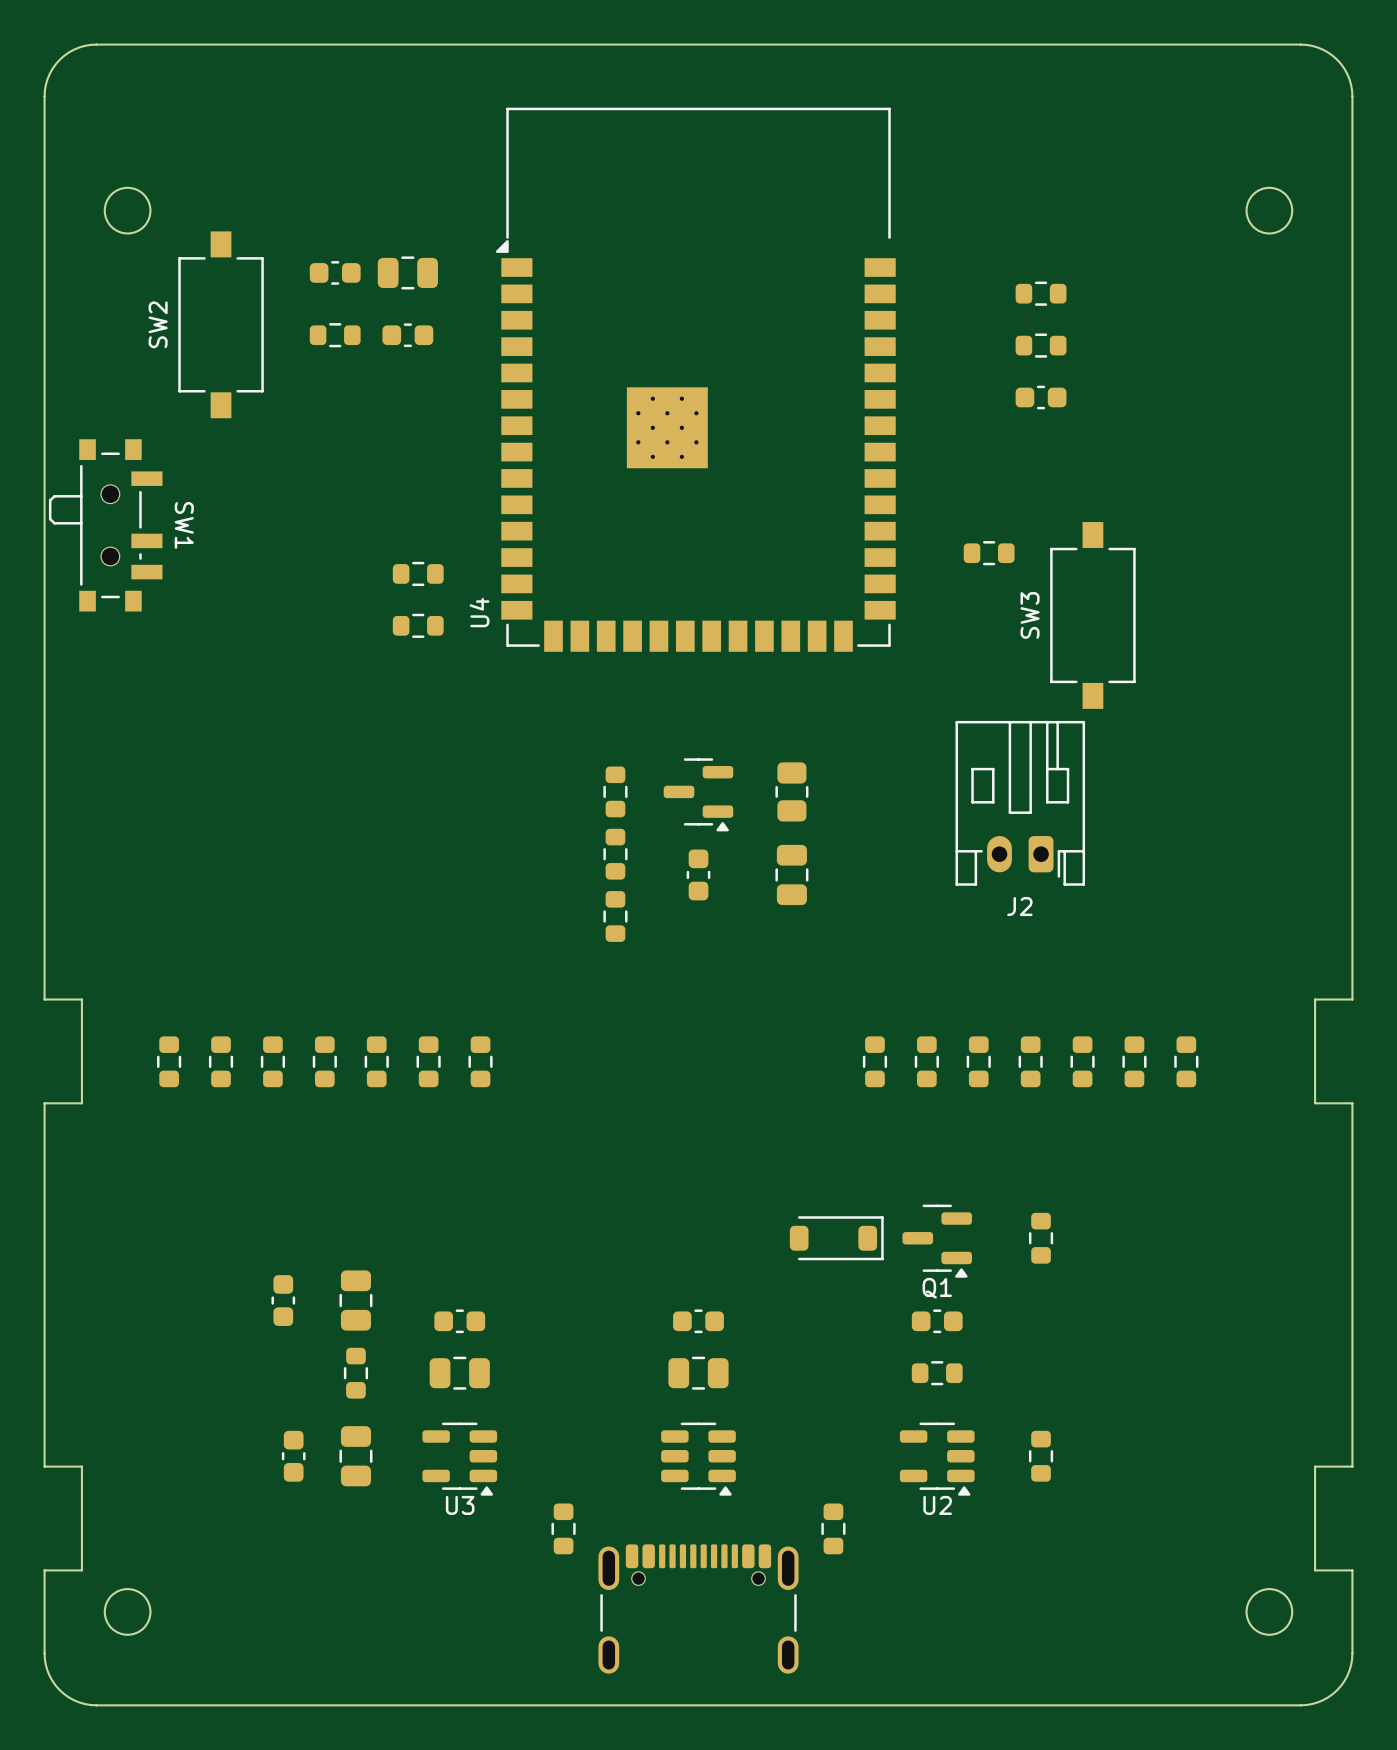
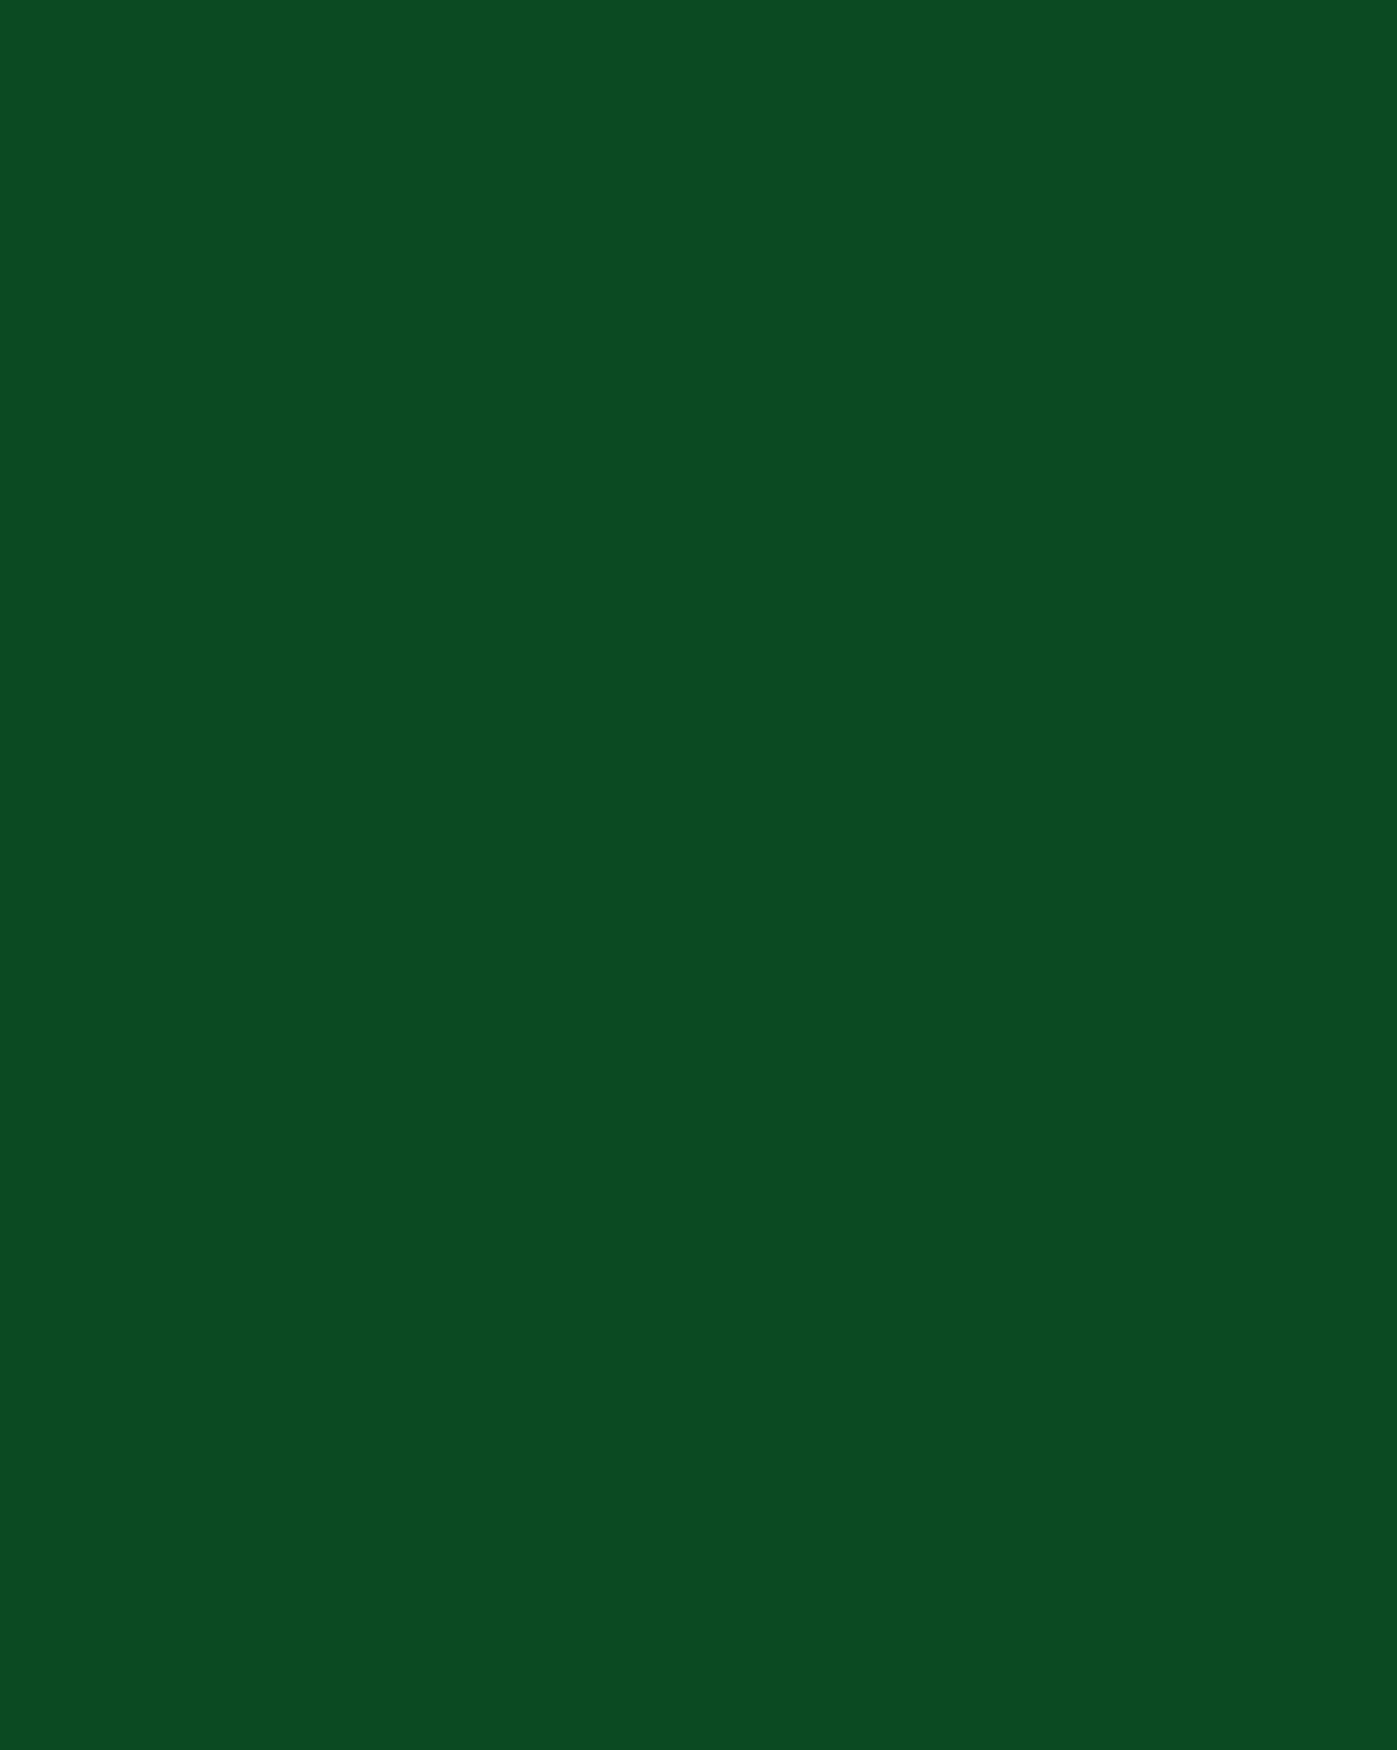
board edge: (1300, 44) (96, 44) (73, 49) (55, 64) (47, 79) (44, 96) (44, 999) (81, 999) (81, 1103) (44, 1103) (44, 1466) (81, 1466) (81, 1570) (44, 1570) (44, 1659) (49, 1675) (64, 1694) (79, 1702) (96, 1705) (1300, 1705) (1323, 1700) (1341, 1685) (1349, 1670) (1352, 1659) (1352, 1570) (1315, 1570) (1315, 1466) (1352, 1466) (1352, 1103) (1315, 1103) (1315, 999) (1352, 999) (1352, 96) (1347, 73) (1337, 59) (1317, 47) (1300, 44) -> none
round board edge: [103, 186, 152, 235] -> none
round board edge: [1245, 186, 1294, 235] -> none
part: (335, 272) -> none
part: (407, 272) -> none
part: (1041, 293) -> none
SW2: (221, 324) -> none
part: (335, 335) -> none
part: (407, 335) -> none
part: (1041, 345) -> none
U4: (695, 379) -> none
part: (1041, 397) -> none
SW1: (105, 525) -> none
part: (989, 553) -> none
part: (418, 573) -> none
SW3: (1092, 615) -> none
part: (418, 625) -> none
part: (615, 791) -> none
part: (791, 791) -> none
part: (698, 794) -> none
J2: (1020, 803) -> none
part: (615, 854) -> none
part: (698, 874) -> none
part: (791, 874) -> none
part: (615, 916) -> none
part: (169, 1061) -> none
part: (221, 1061) -> none
part: (272, 1061) -> none
part: (324, 1061) -> none
part: (376, 1061) -> none
part: (428, 1061) -> none
part: (480, 1061) -> none
part: (874, 1061) -> none
part: (926, 1061) -> none
part: (978, 1061) -> none
part: (1030, 1061) -> none
part: (1082, 1061) -> none
part: (1134, 1061) -> none
part: (1186, 1061) -> none
part: (836, 1238) -> none
part: (1041, 1238) -> none
Q1: (937, 1241) -> none
part: (283, 1300) -> none
part: (355, 1300) -> none
part: (459, 1321) -> none
part: (698, 1321) -> none
part: (937, 1321) -> none
part: (355, 1373) -> none
part: (459, 1373) -> none
part: (698, 1373) -> none
part: (937, 1373) -> none
part: (293, 1456) -> none
part: (355, 1456) -> none
part: (1041, 1456) -> none
U3: (459, 1459) -> none
part: (698, 1459) -> none
U2: (937, 1459) -> none
part: (563, 1528) -> none
part: (833, 1528) -> none
round board edge: [103, 1588, 152, 1636] -> none
round board edge: [1245, 1588, 1294, 1636] -> none
part: (698, 1609) -> none

